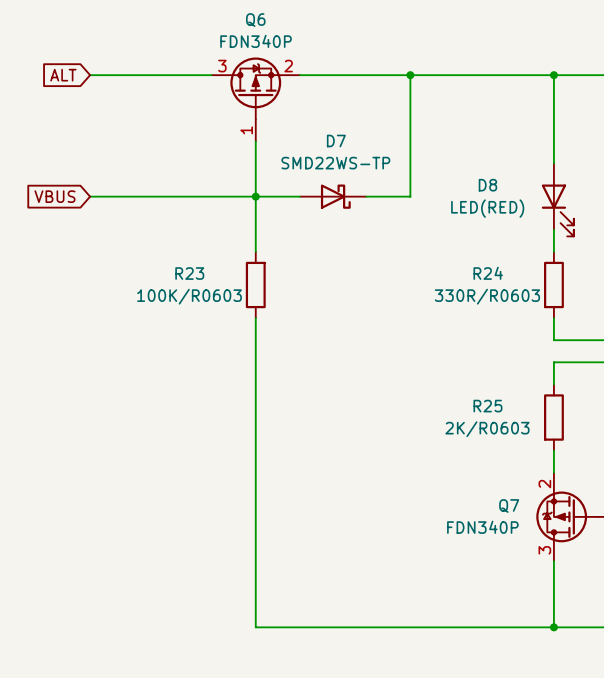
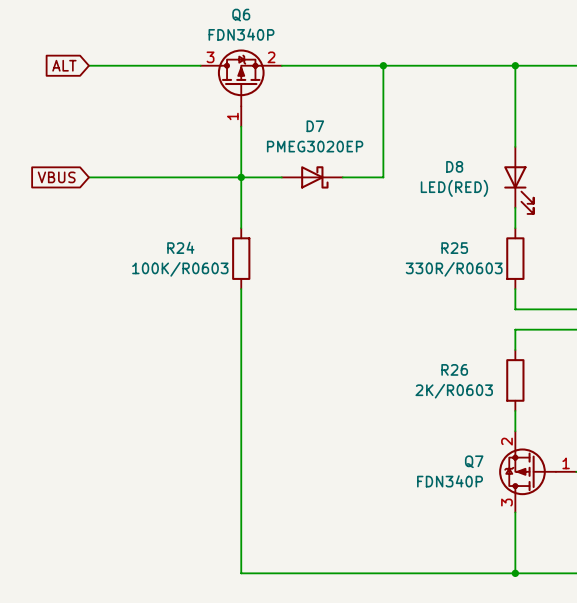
D7 value: SMD22WS-TP (335, 163) -> PMEG3020EP (315, 146)
R23 name: R23 (189, 273) -> R24 (180, 247)
R24 name: R24 (488, 273) -> R25 (454, 248)
R25 name: R25 (487, 406) -> R26 (454, 369)

